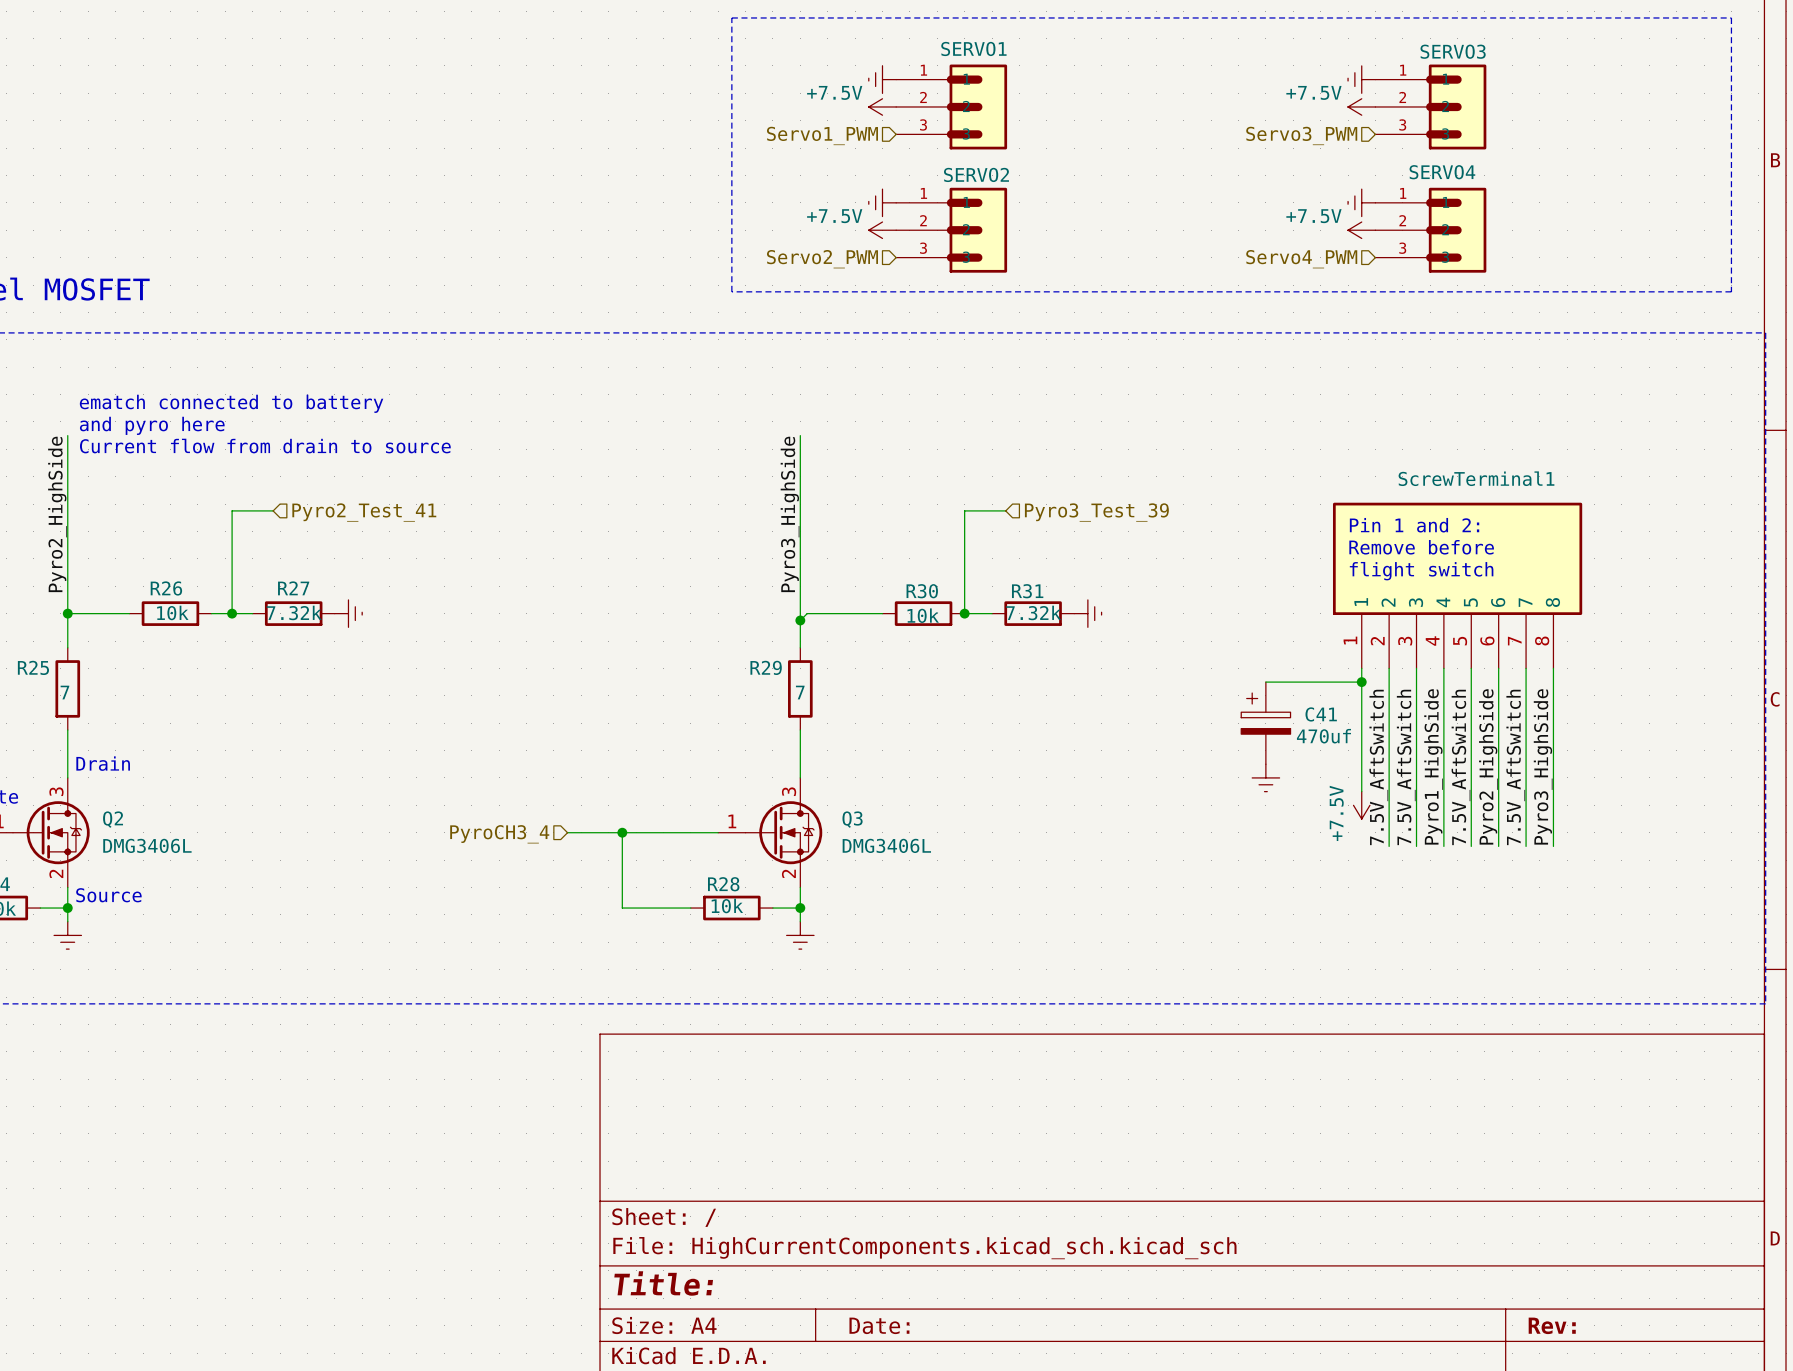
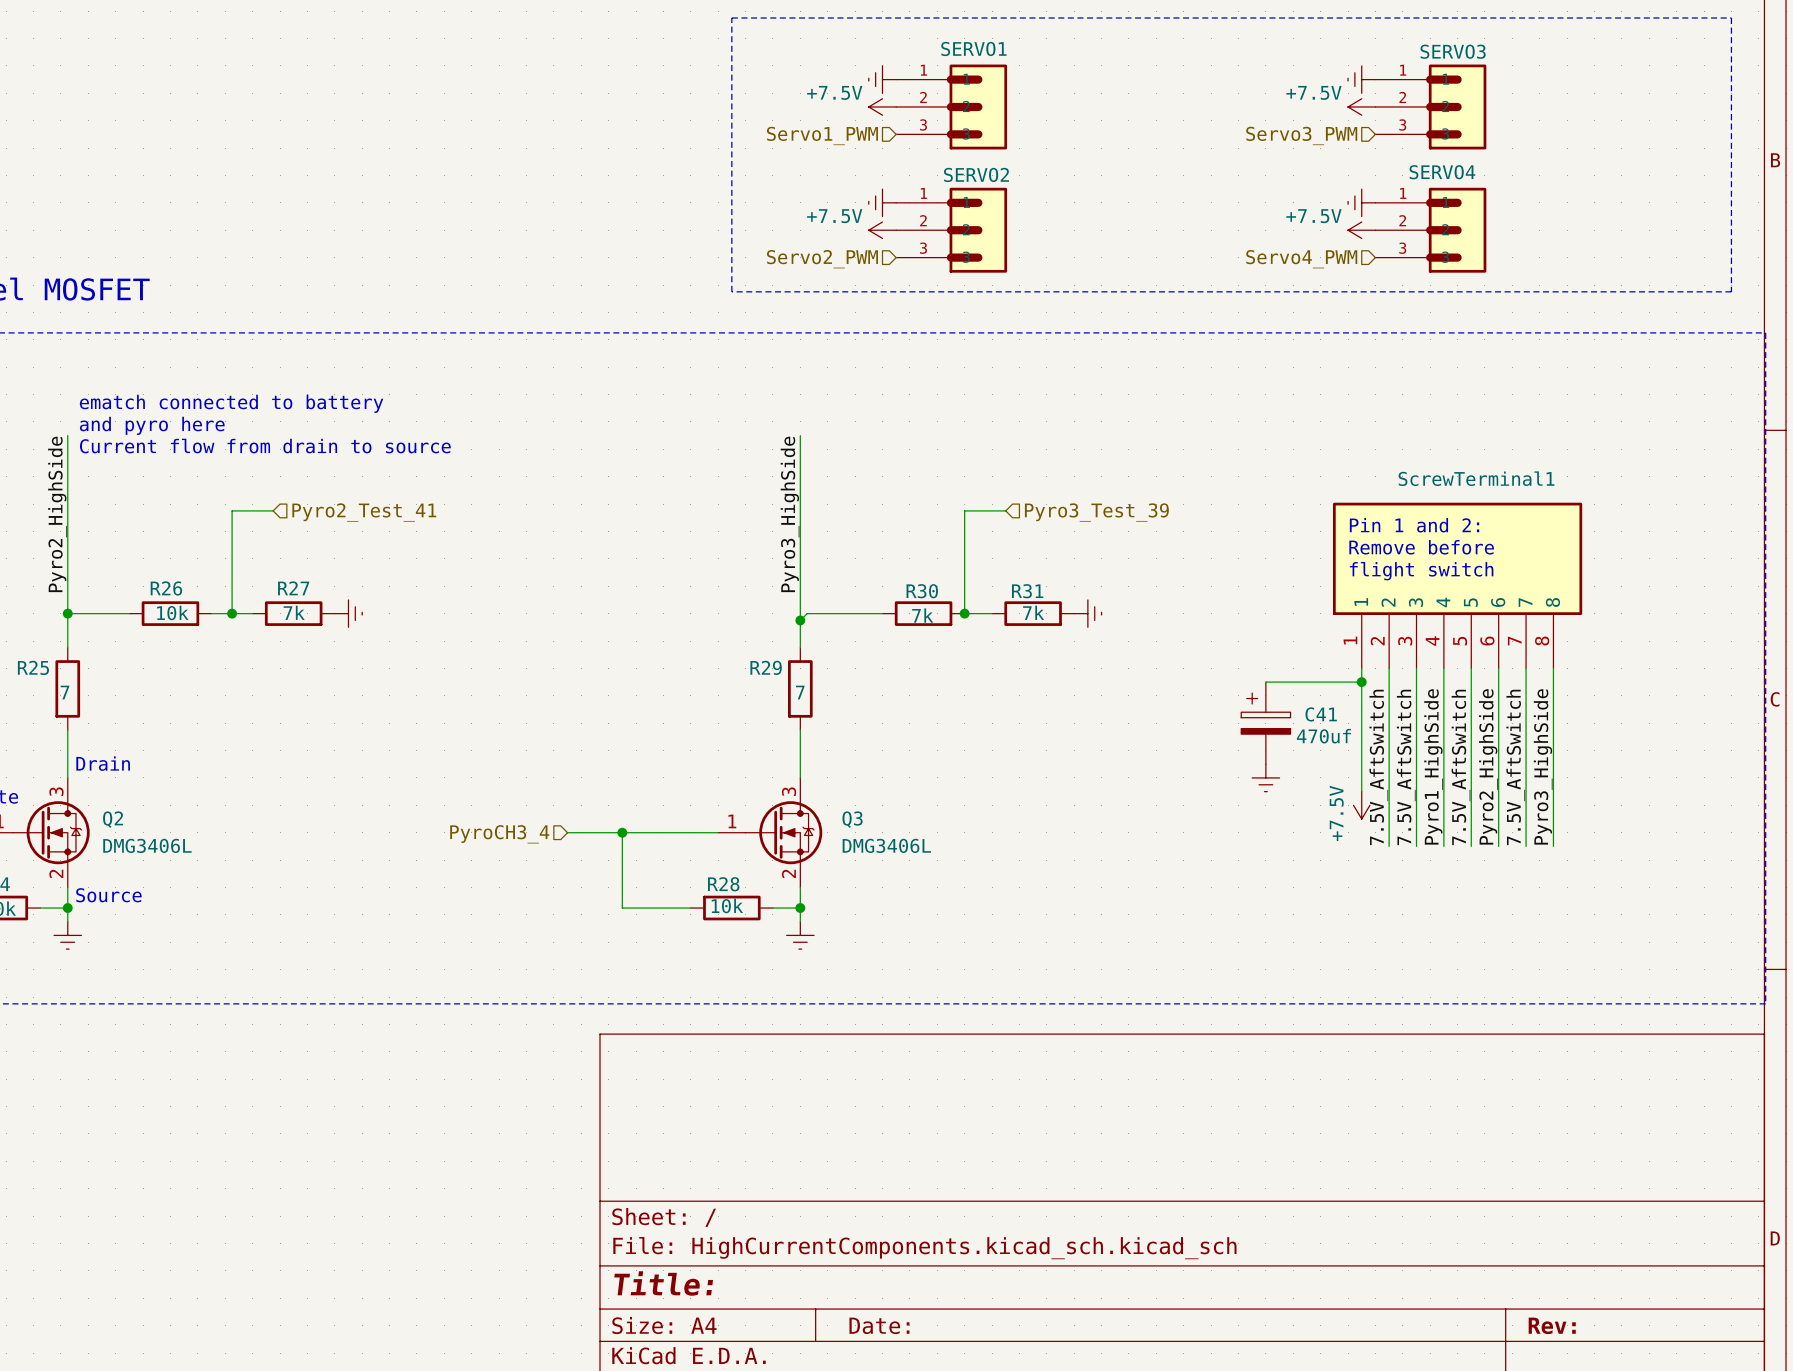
R27 value: 7.32k (294, 612) -> 7k (294, 612)
R31 value: 7.32k (1033, 612) -> 7k (1033, 612)
R30 value: 10k (923, 615) -> 7k (922, 615)

